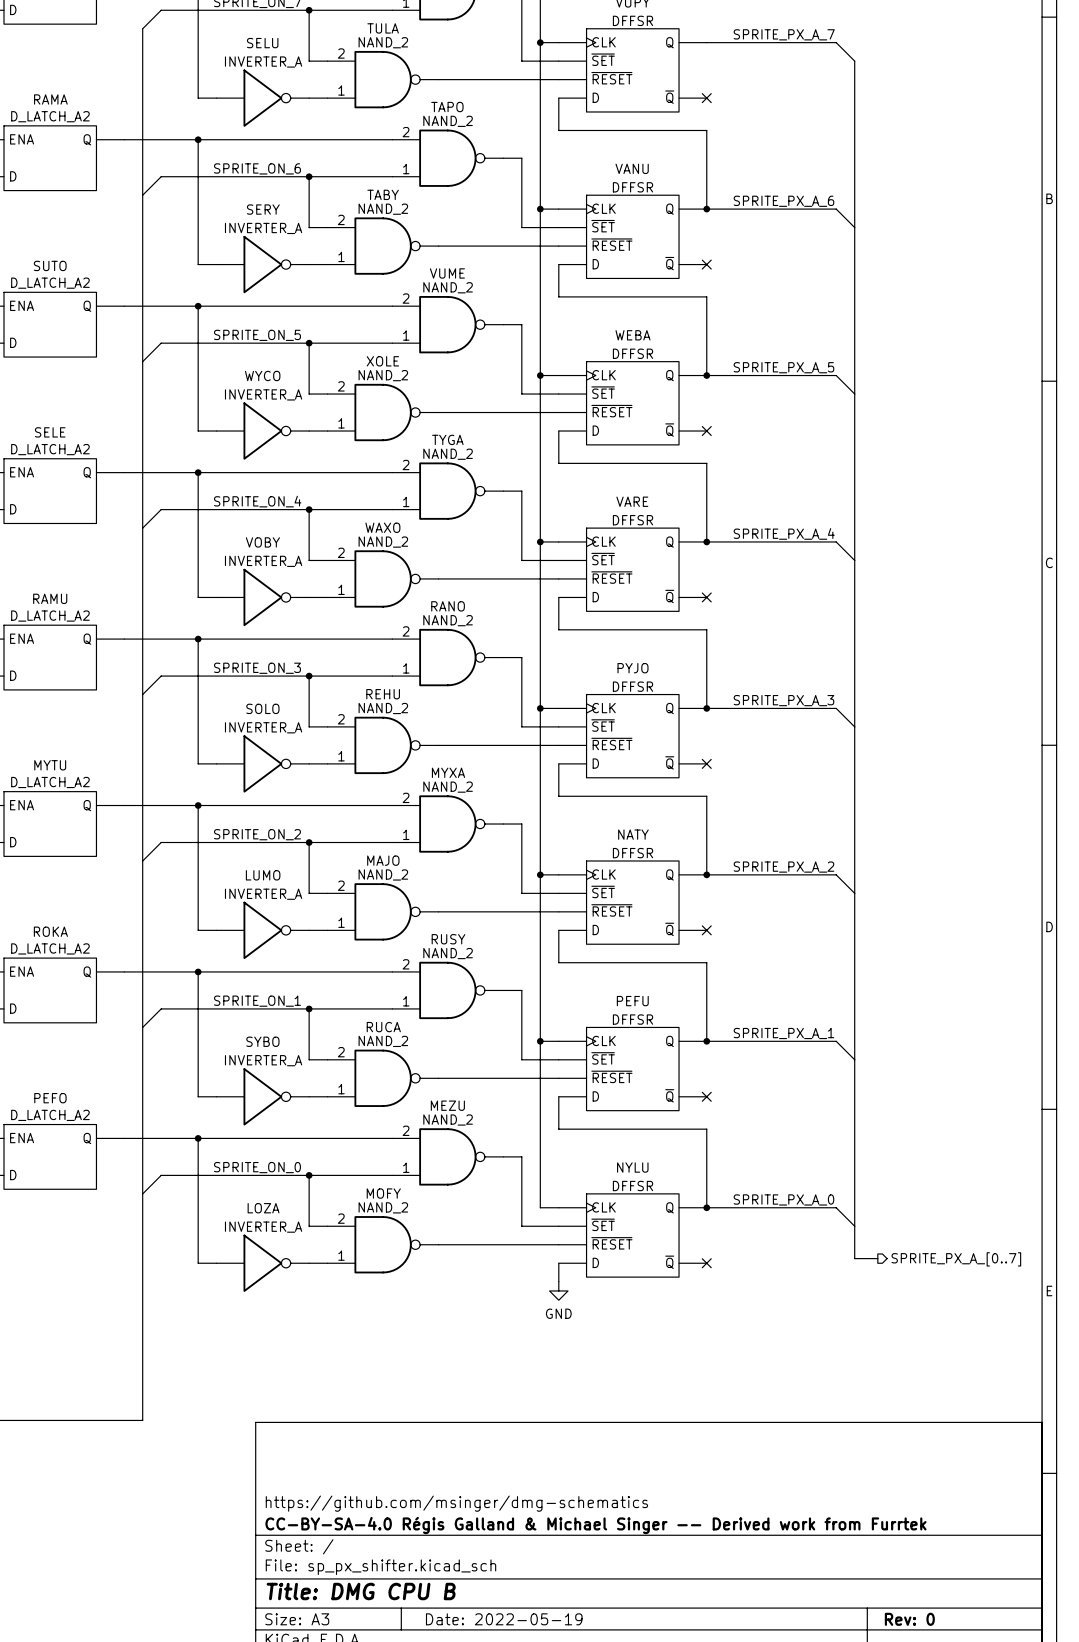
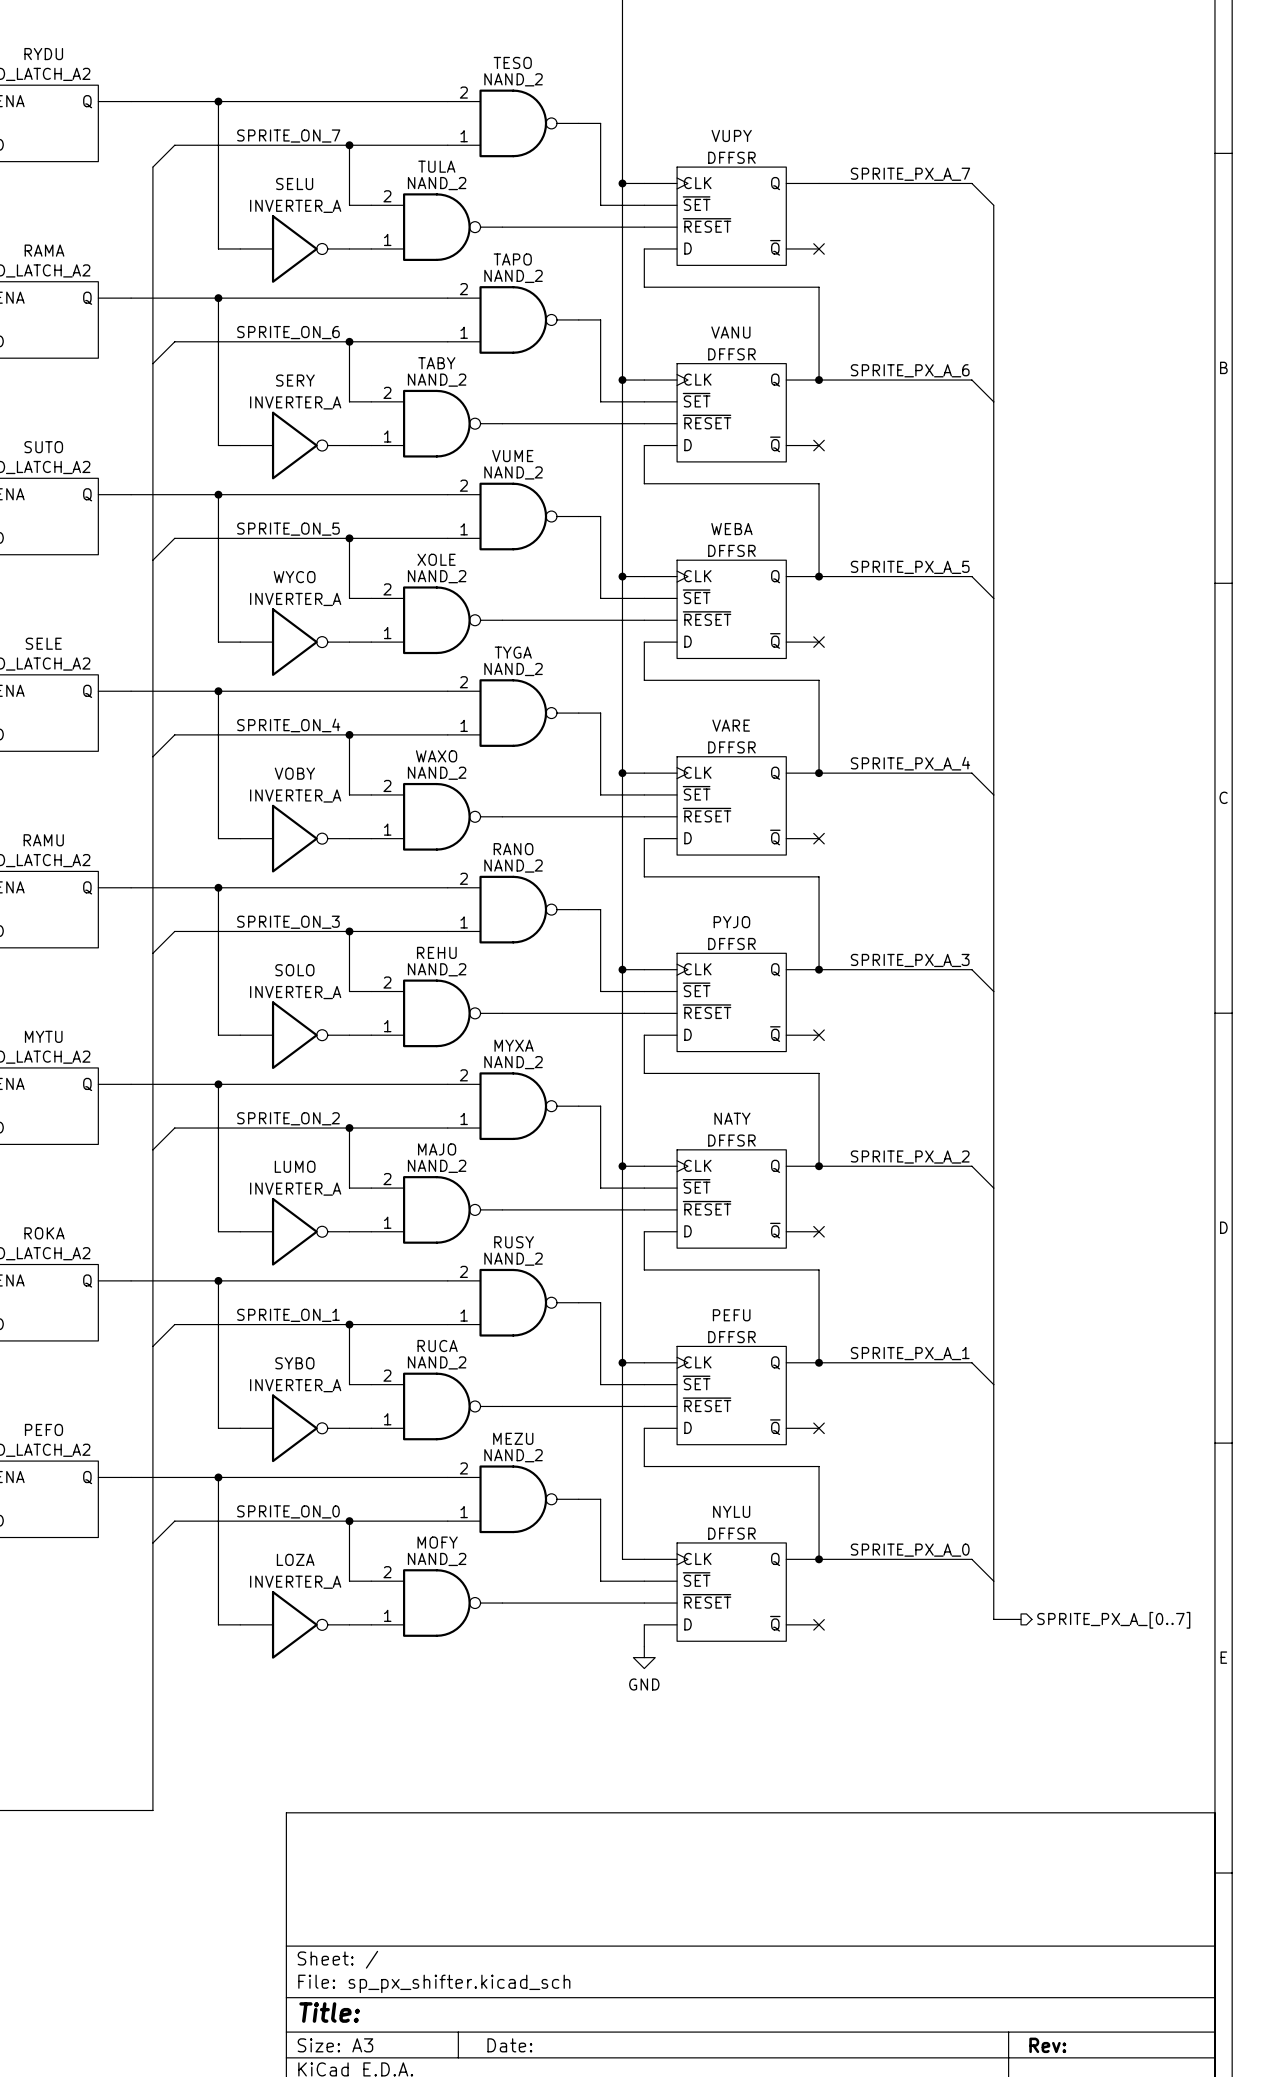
title block: https://github.com/msinger/dmg-schematics (456, 1503) -> none
title block: CC-BY-SA-4.0 Régis Galland & Michael Singer -- Derived work from Furrtek (595, 1525) -> none
title block: Title: DMG CPU B (361, 1591) -> Title: (329, 2012)
title block: Date: 2022-05-19 (504, 1619) -> Date: (509, 2045)
title block: Rev: 0 (909, 1619) -> Rev: (1047, 2045)

